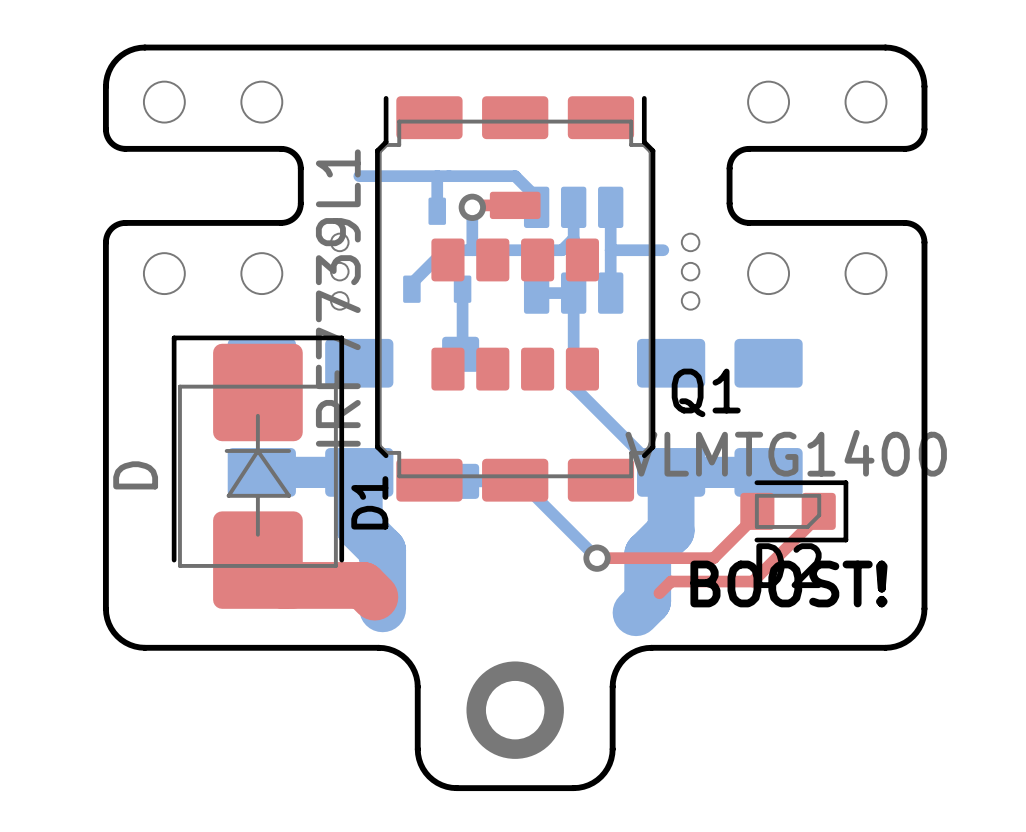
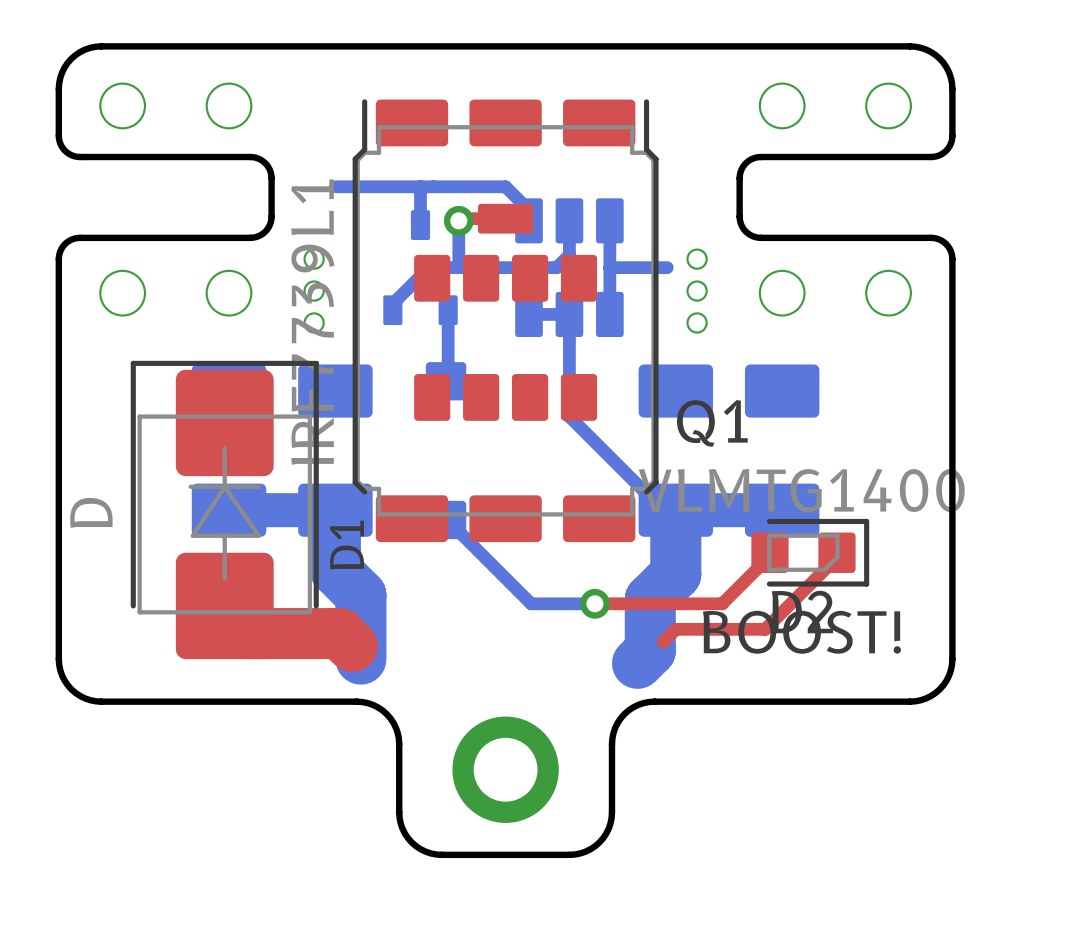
bottom track: (461, 481) (520, 481) (597, 558) -> (447, 519) (531, 603) (594, 603)

